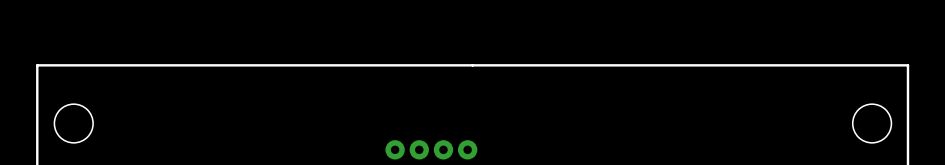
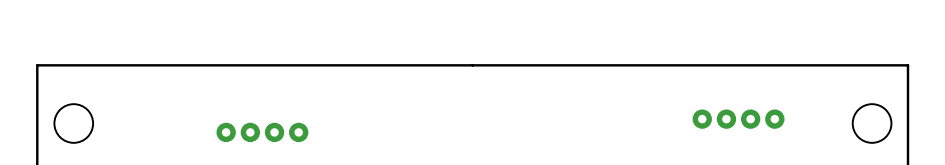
part: none -> (738, 119)
part: none -> (262, 132)
part: (431, 149) -> none

